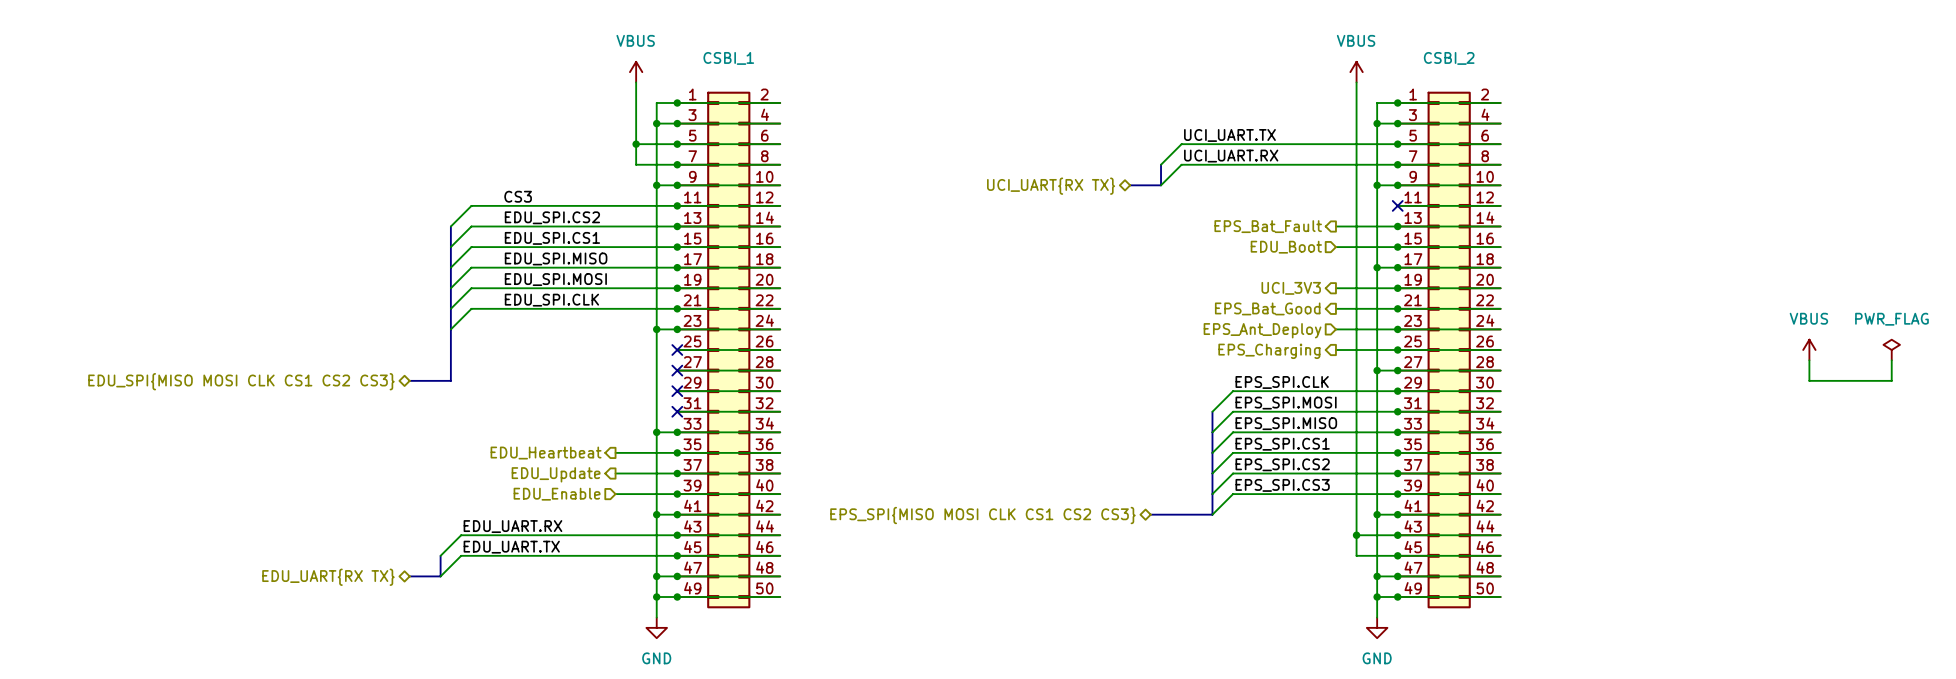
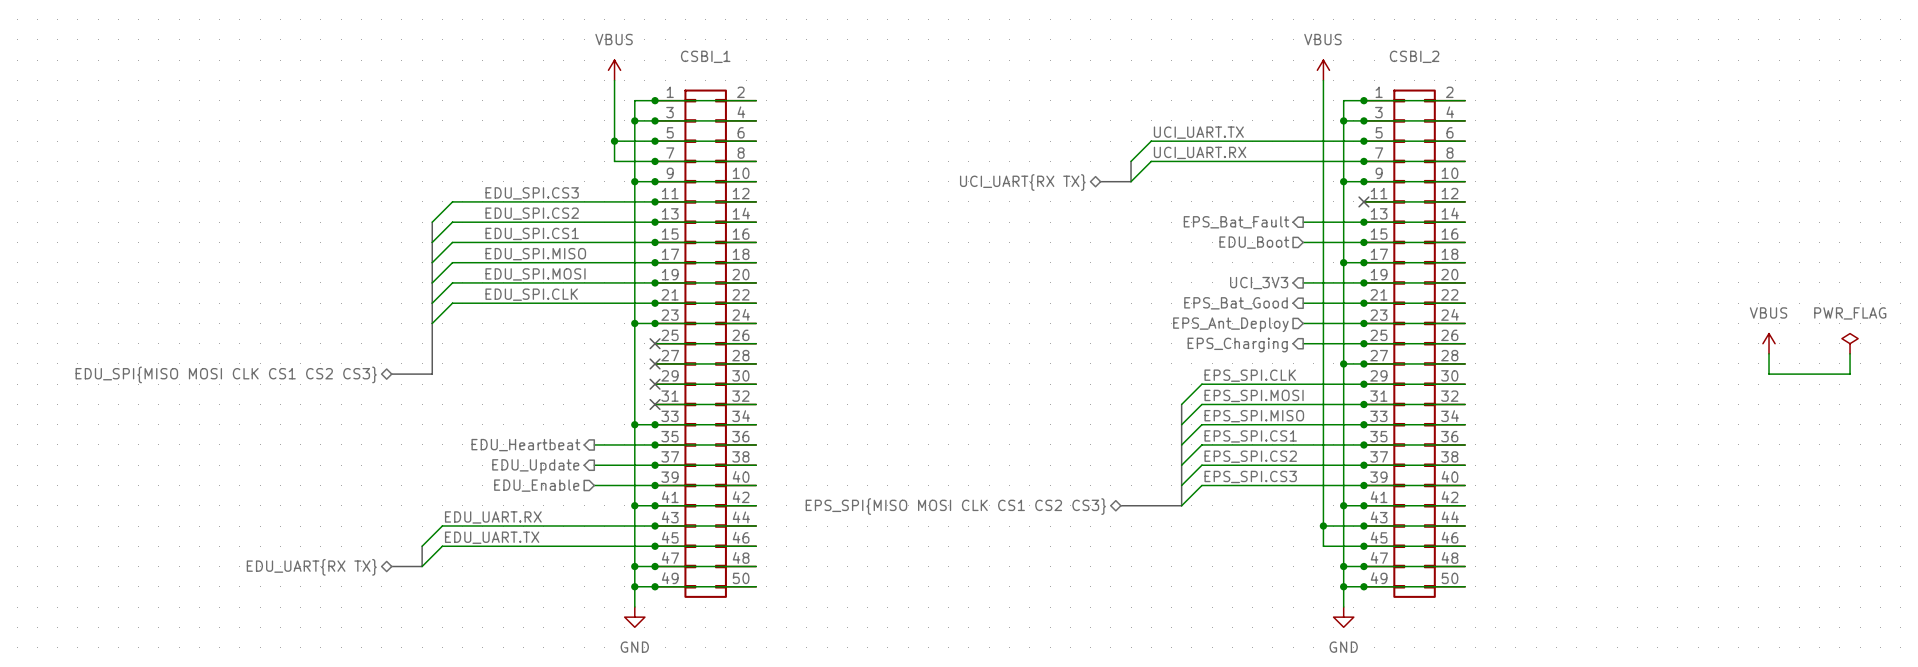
label: CS3 (518, 196) -> EDU_SPI.CS3 (532, 193)

